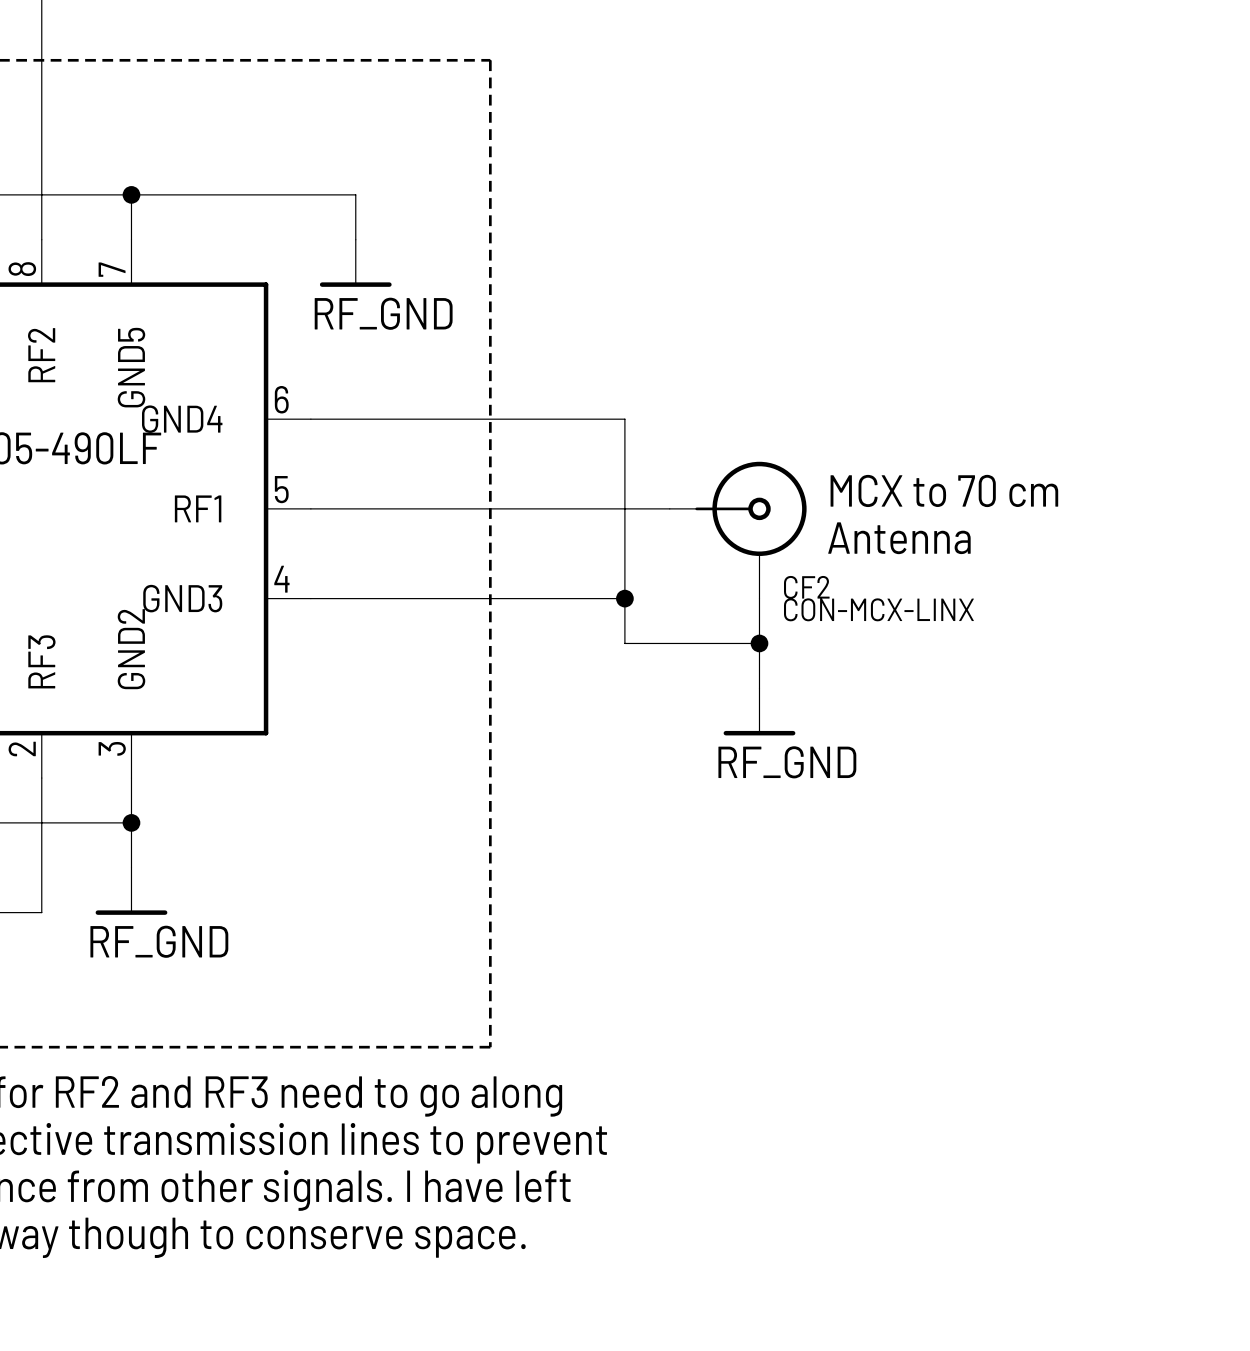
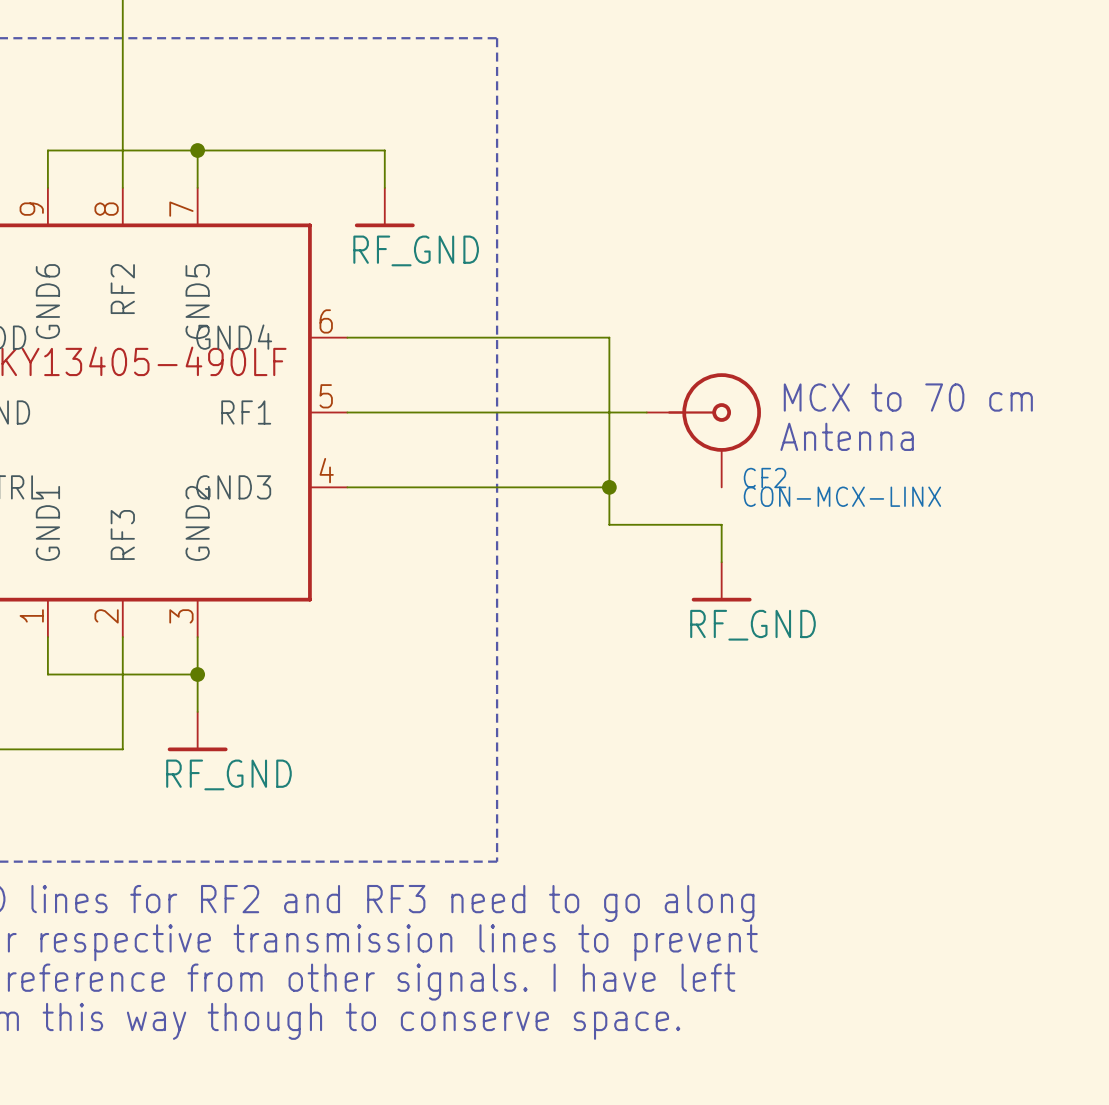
wire: (759, 598) (759, 643) -> none
junction: (759, 643) -> none

